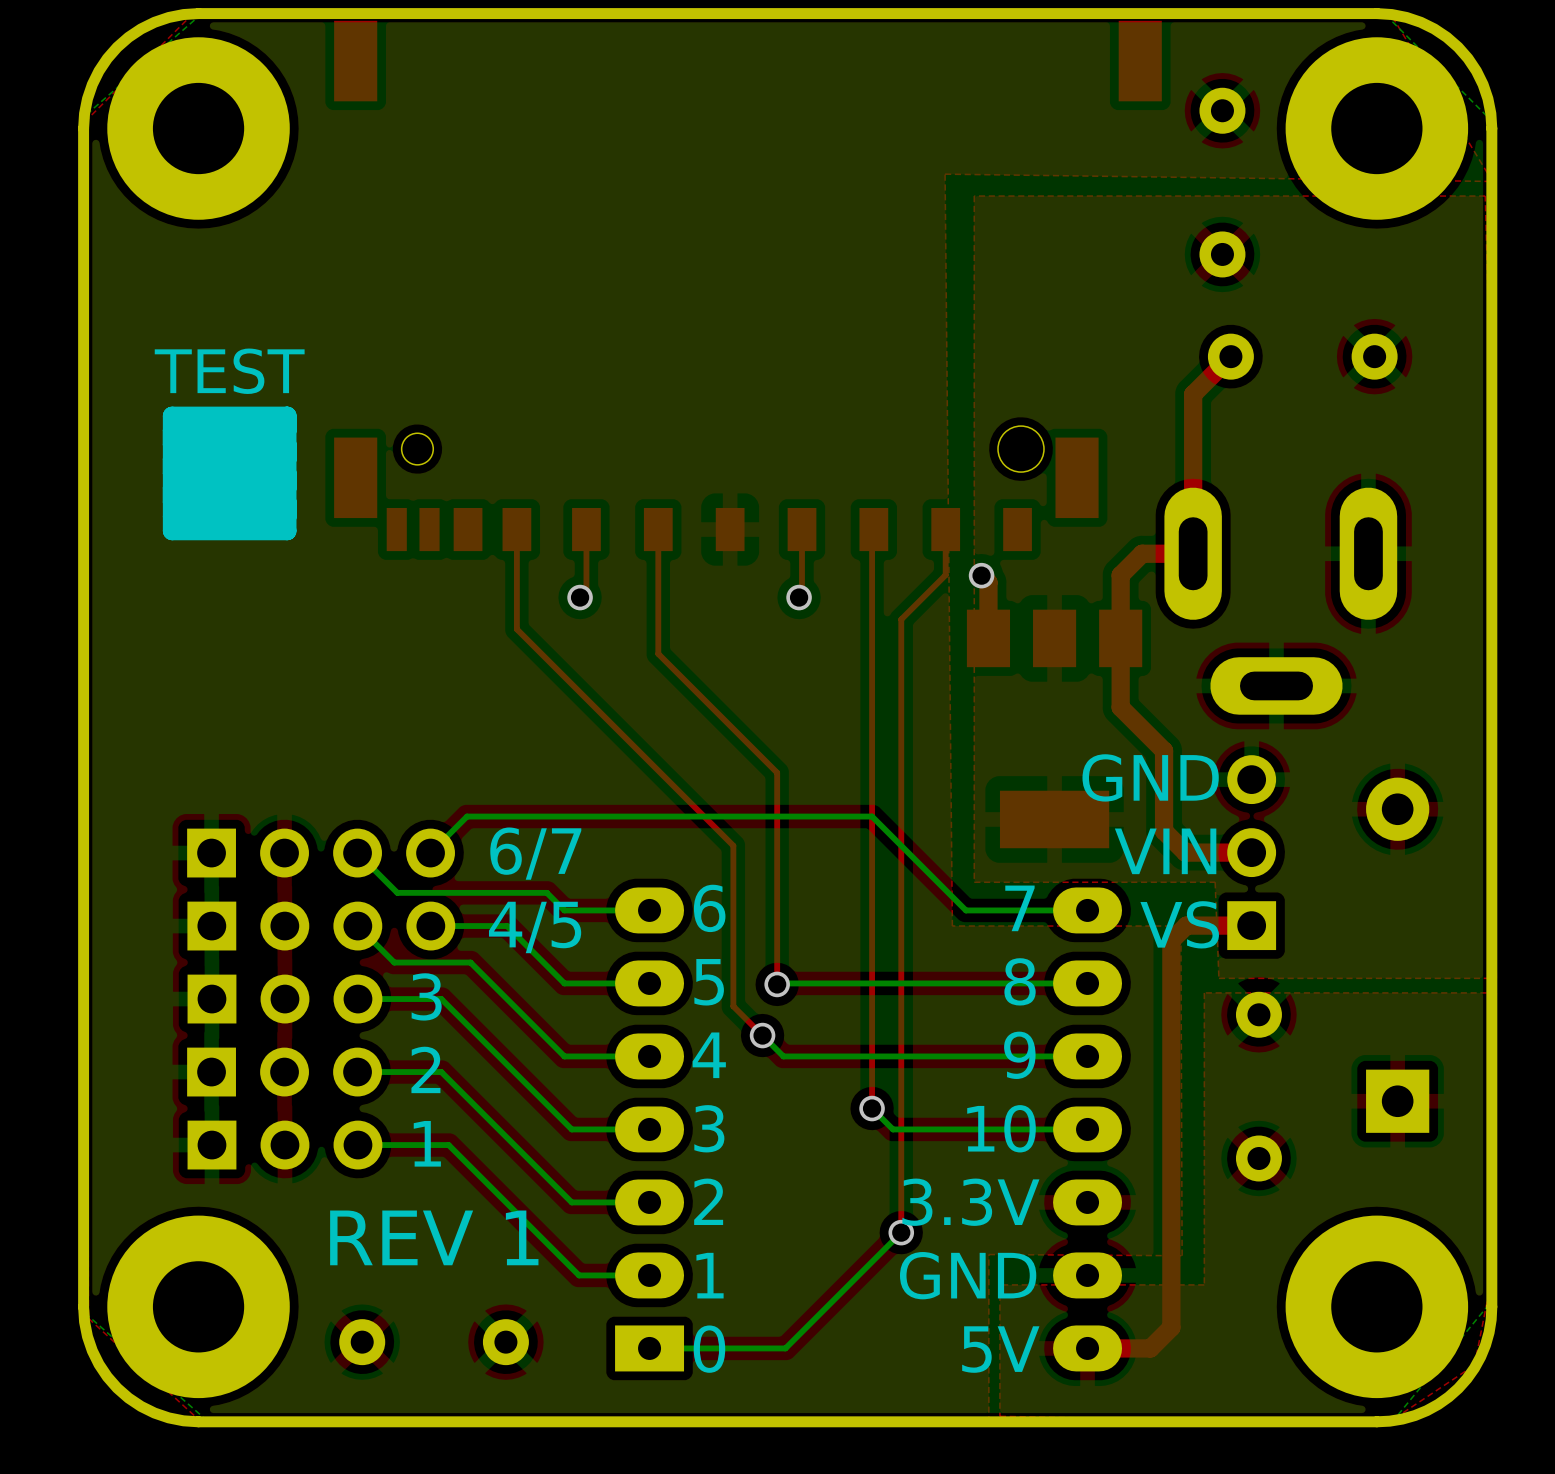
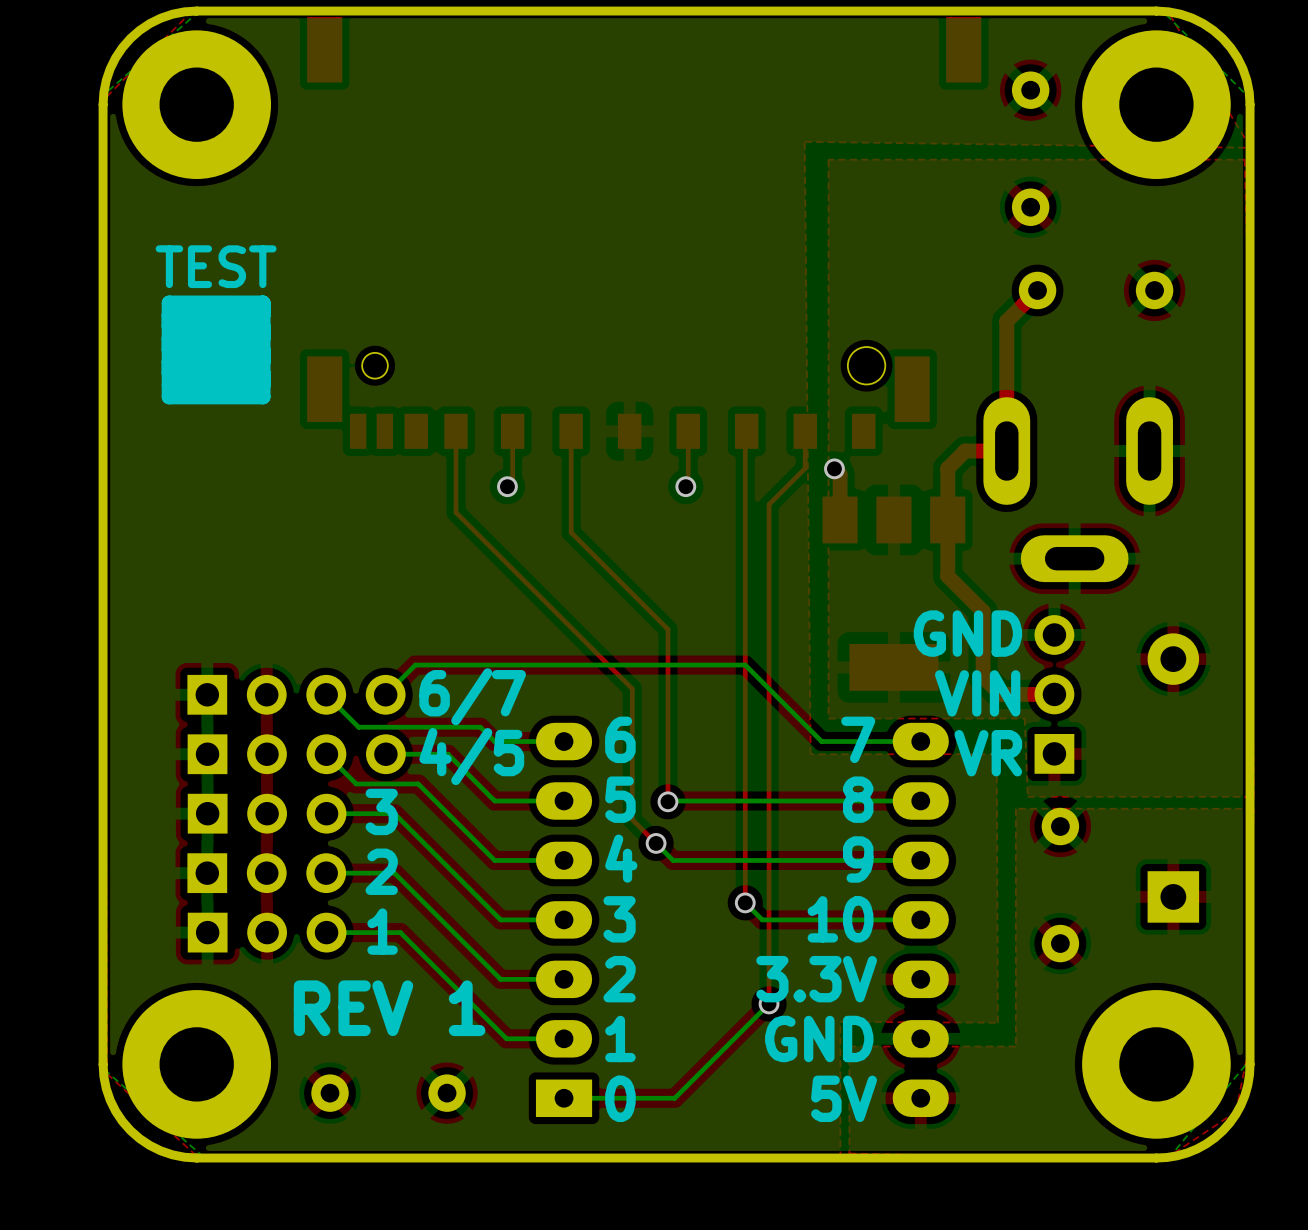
TEST position: (229, 473) -> (216, 349)
text: VS (1179, 924) -> VR (988, 753)
top track: (1251, 925) (1186, 925) (1171, 940) (1171, 1327) (1150, 1348) (1087, 1348) -> none

